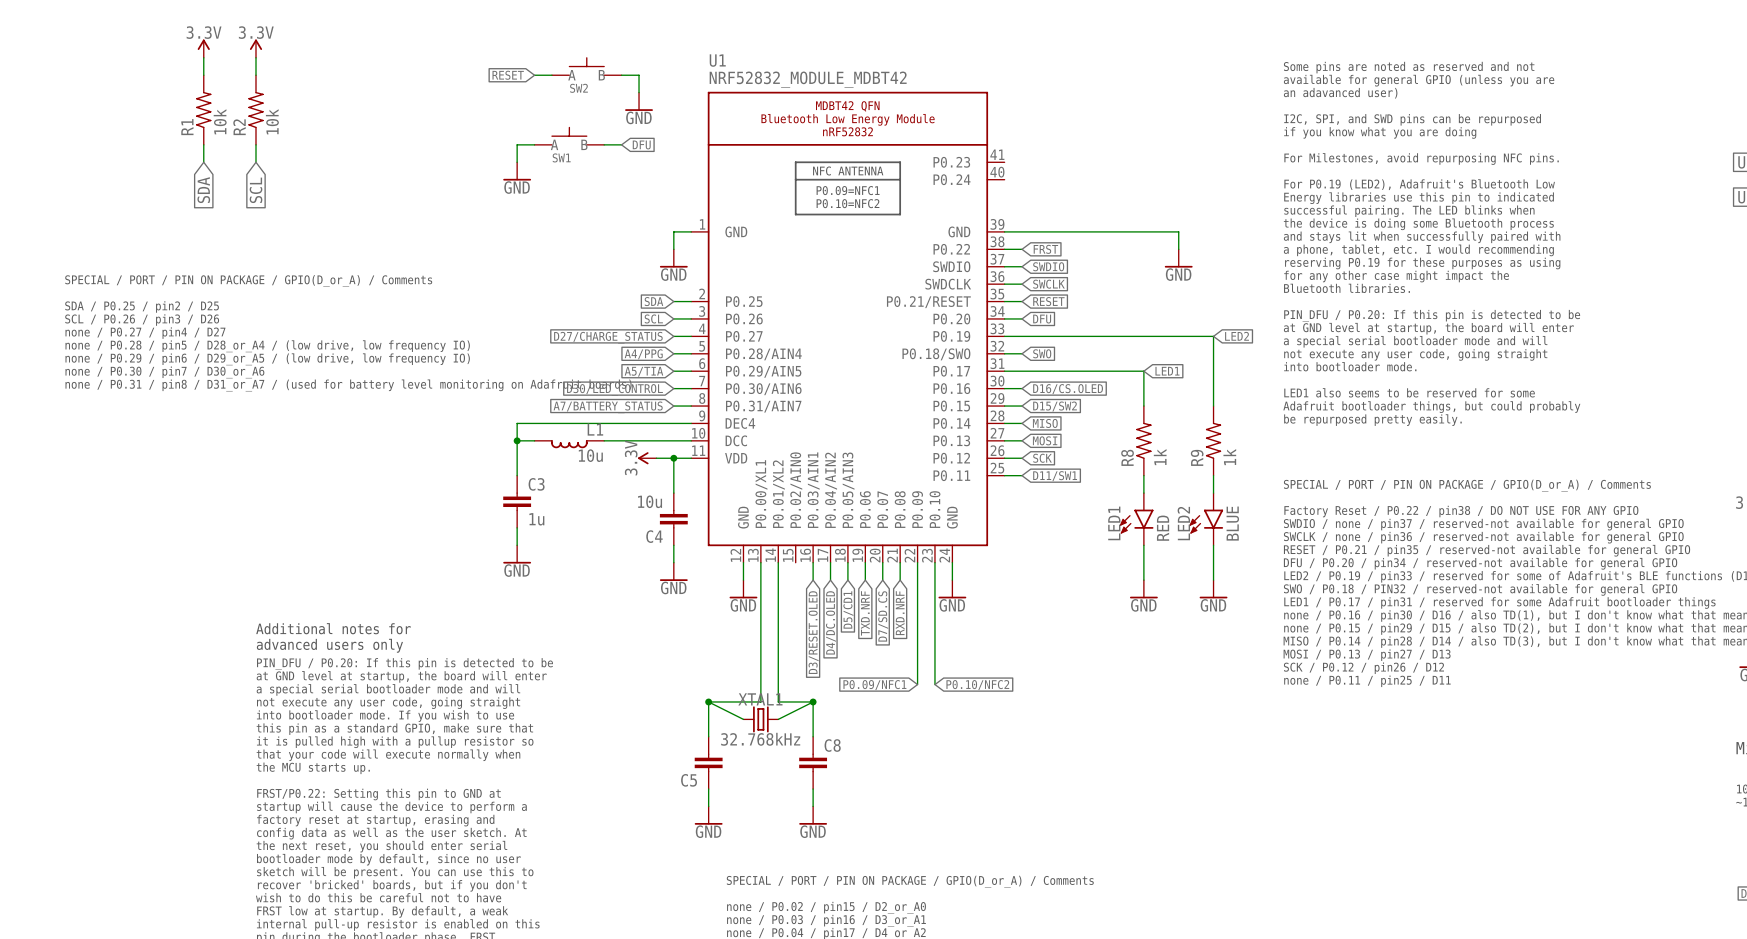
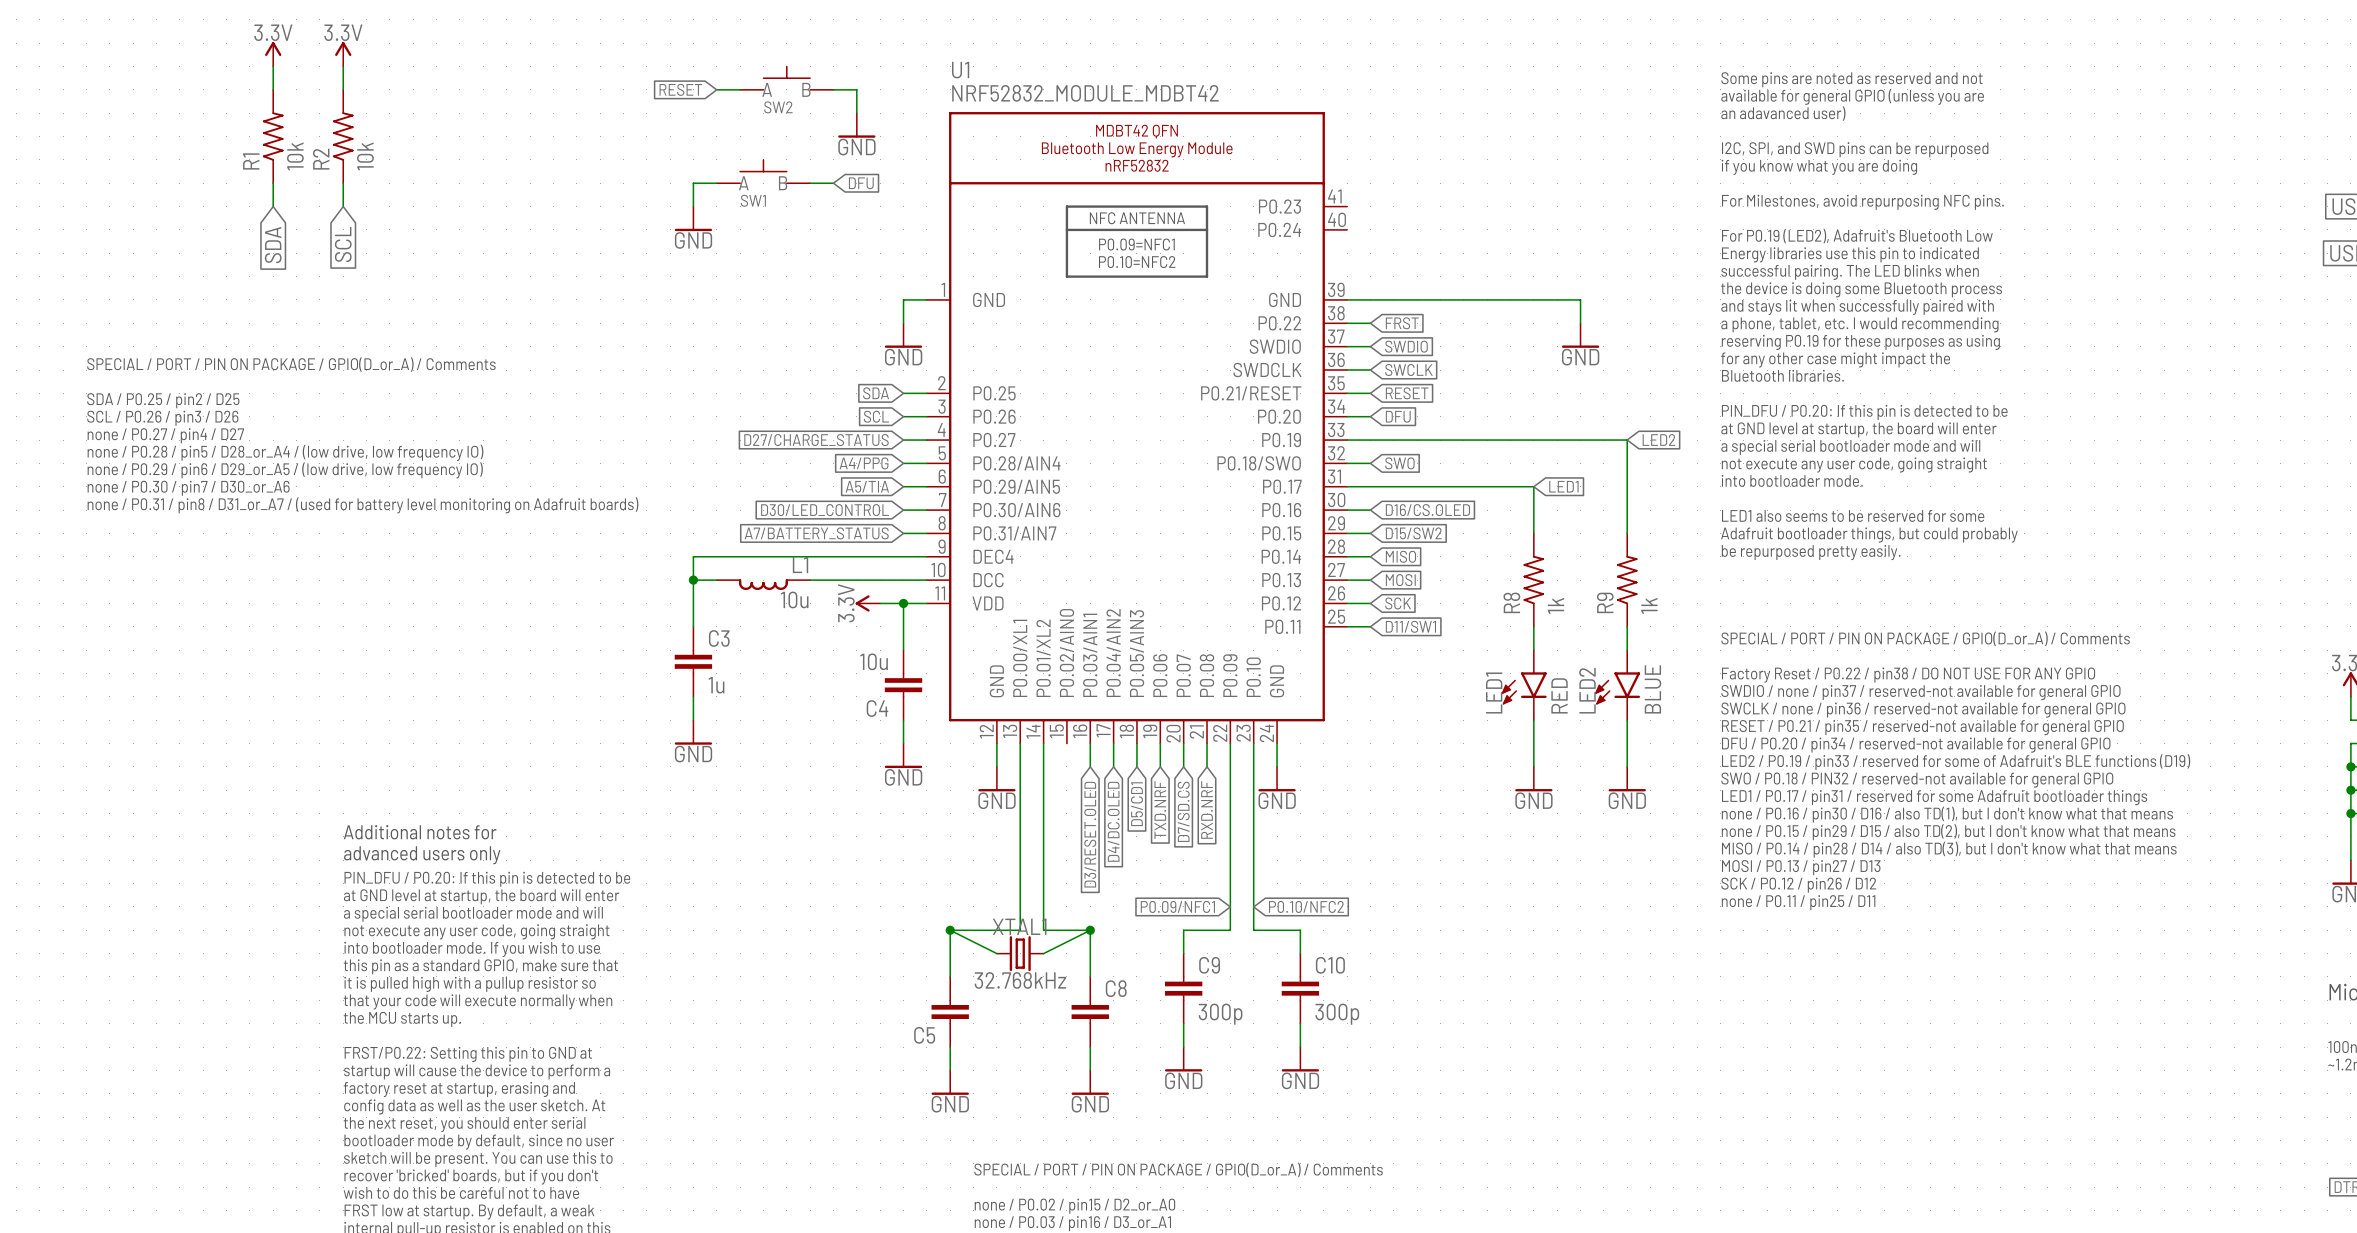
wire: none -> (1230, 906) (1230, 930) (1183, 930) (1183, 953)
wire: none -> (1253, 906) (1253, 930) (1300, 930) (1300, 953)
C9: none -> 300p (1183, 988)
C10: none -> 300p (1300, 988)
wire: none -> (1183, 1023) (1183, 1047)
wire: none -> (1300, 1023) (1300, 1047)
power symbol: none -> GND (1183, 1059)
power symbol: none -> GND (1300, 1059)

